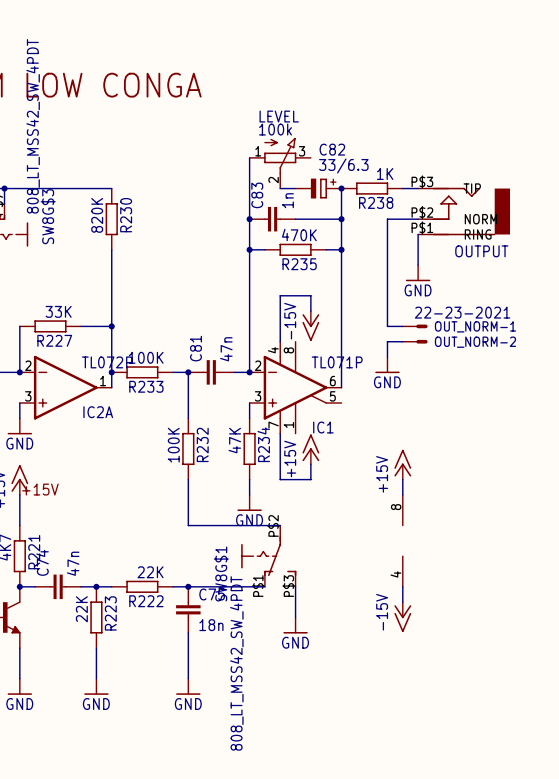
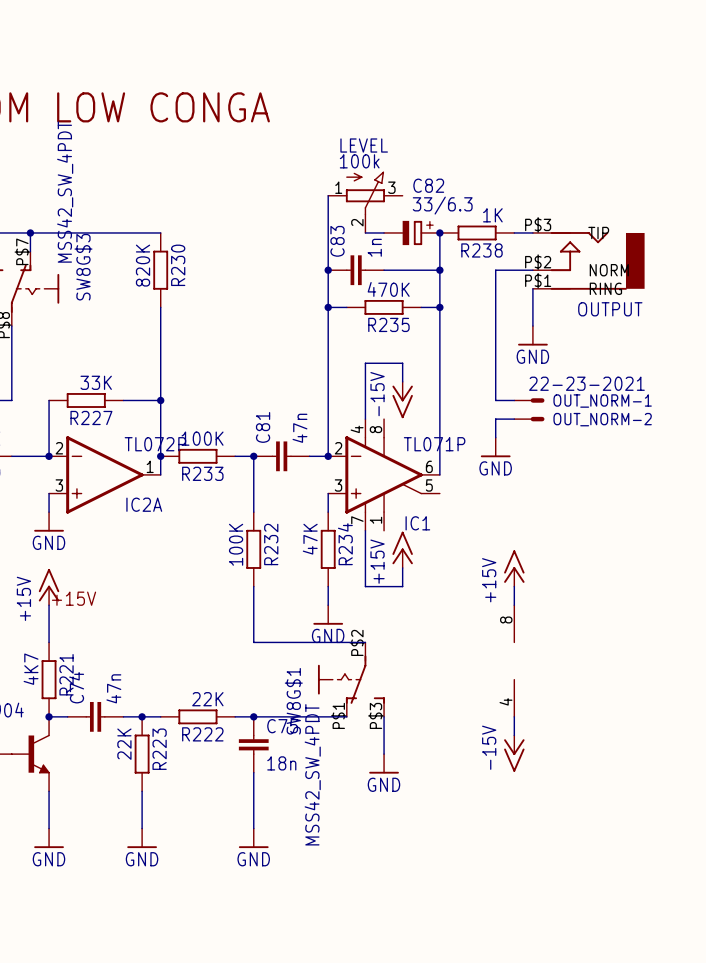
SW8G$3 value: 808_LT_MSS42_SW_4PDT (33, 126) -> MSS42_SW_4PDT (65, 192)
SW8G$1 value: 808_LT_MSS42_SW_4PDT (236, 663) -> MSS42_SW_4PDT (312, 774)

